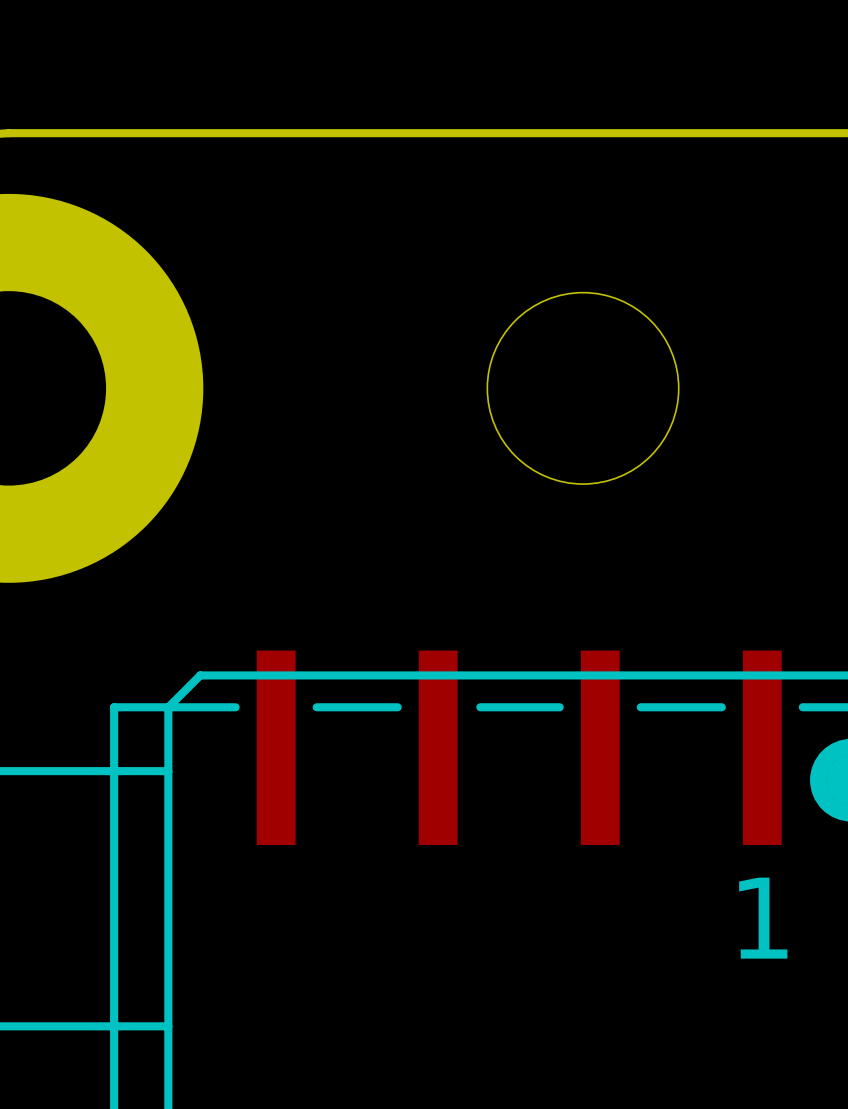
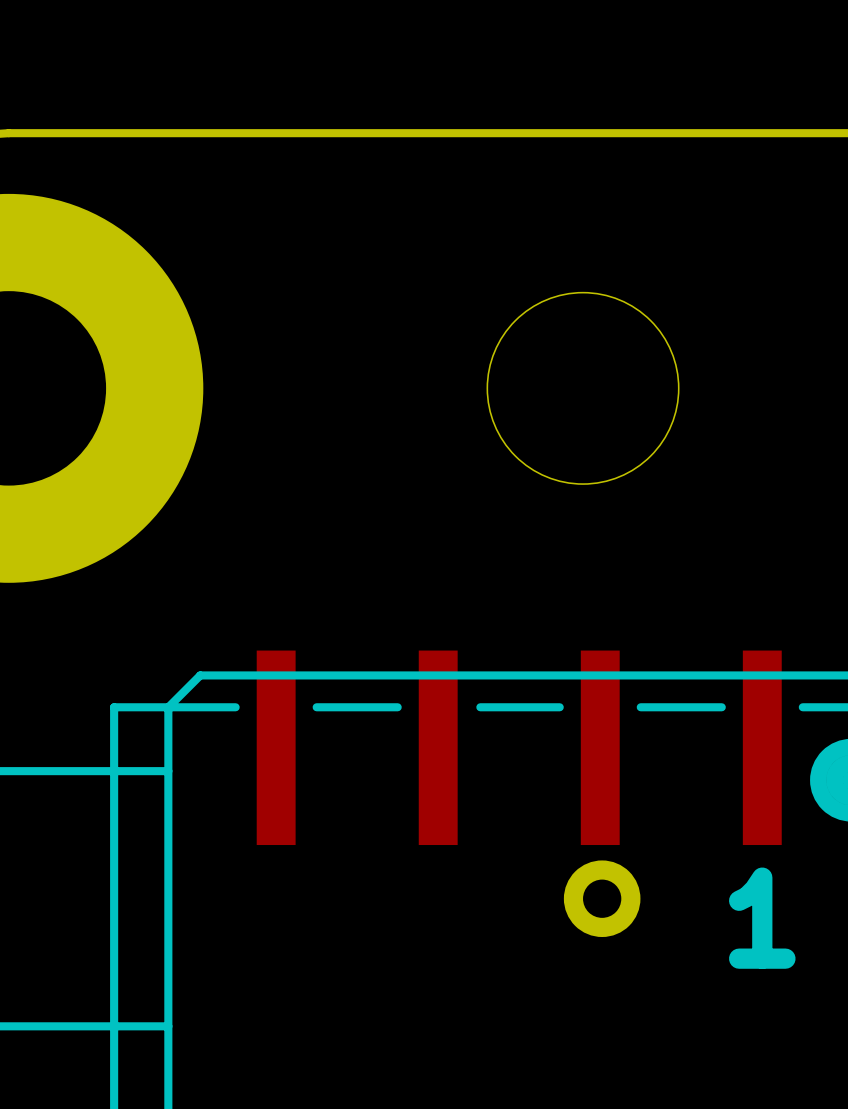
part: none -> (602, 898)

